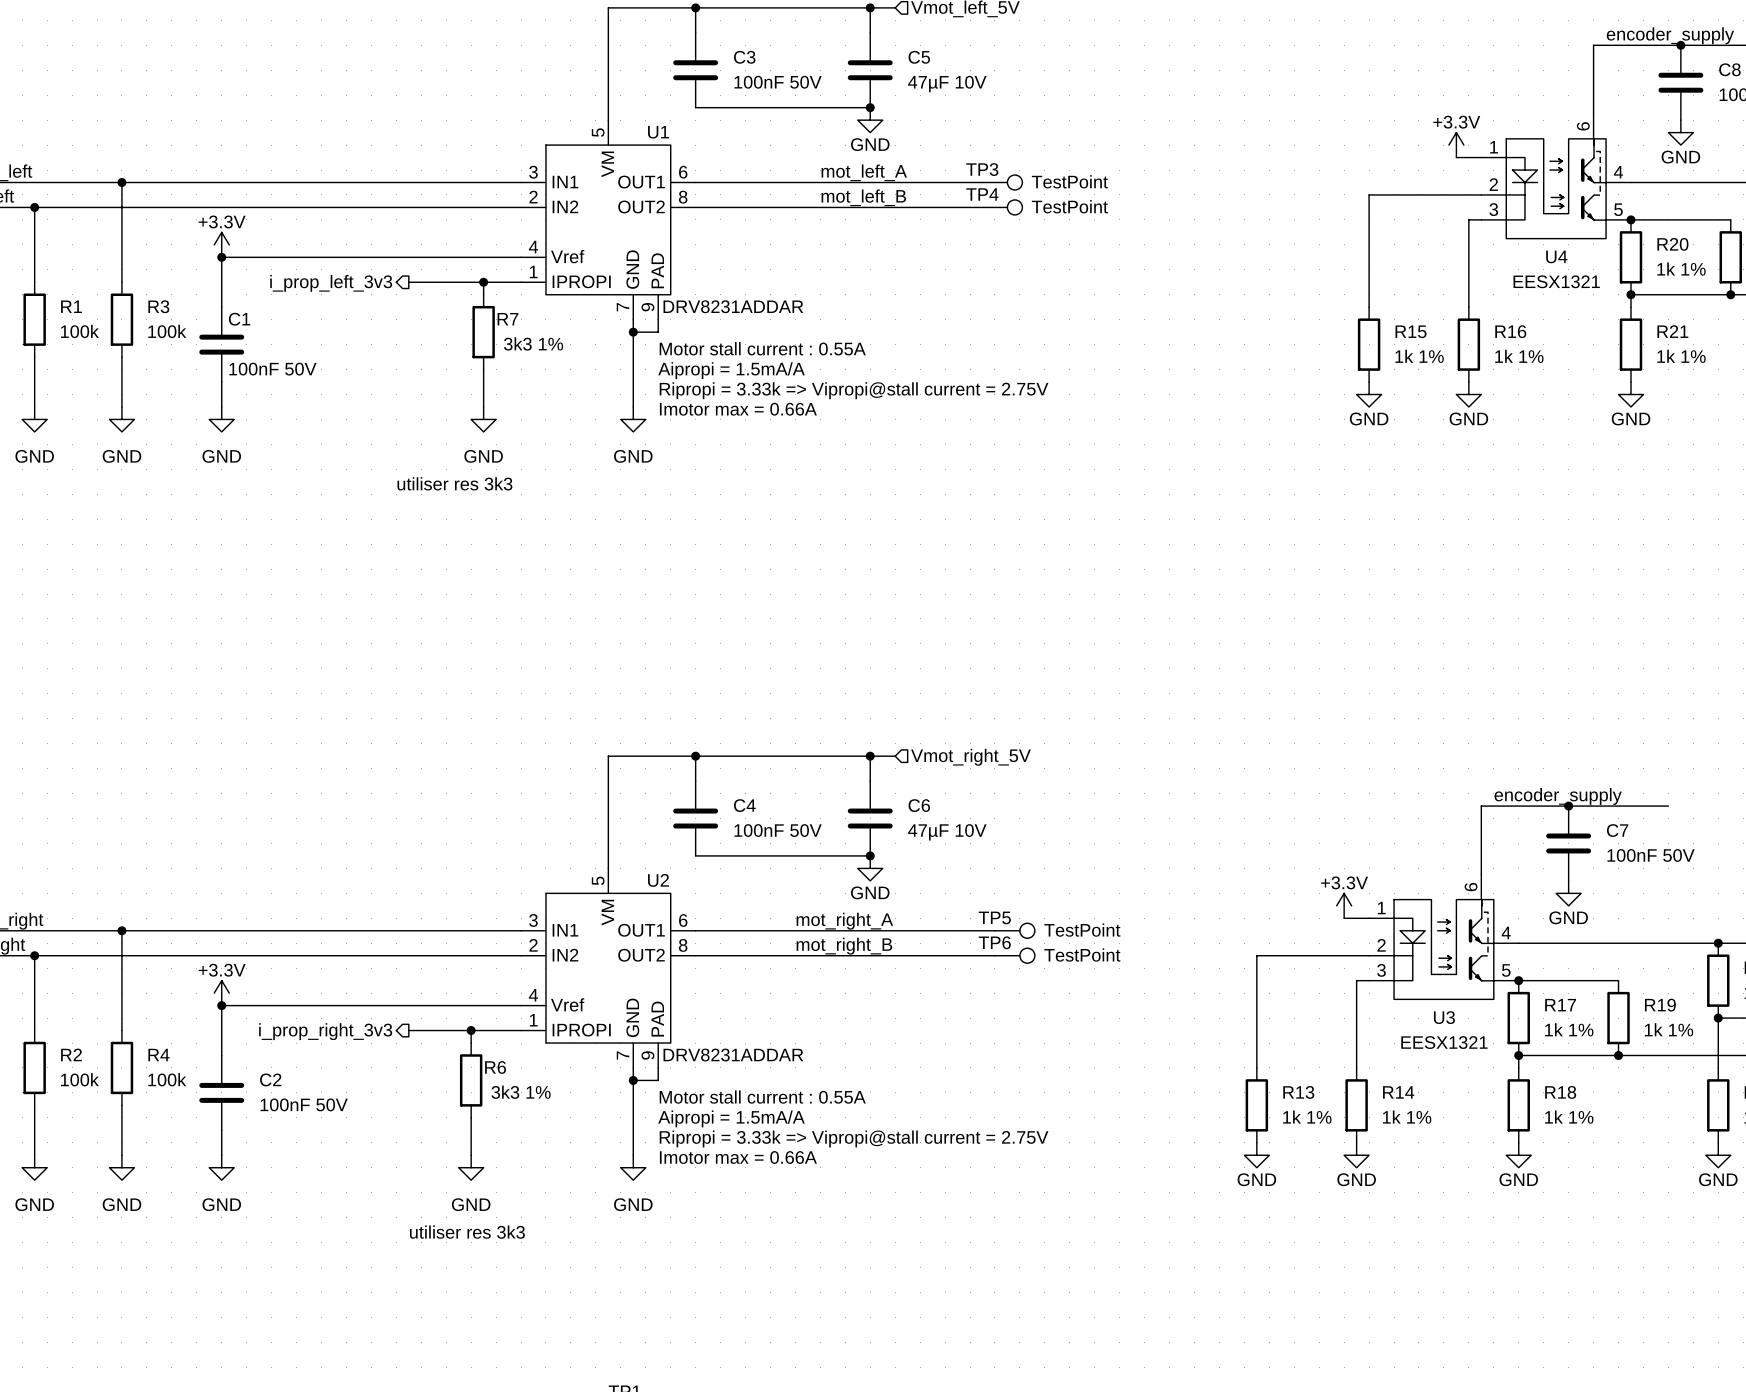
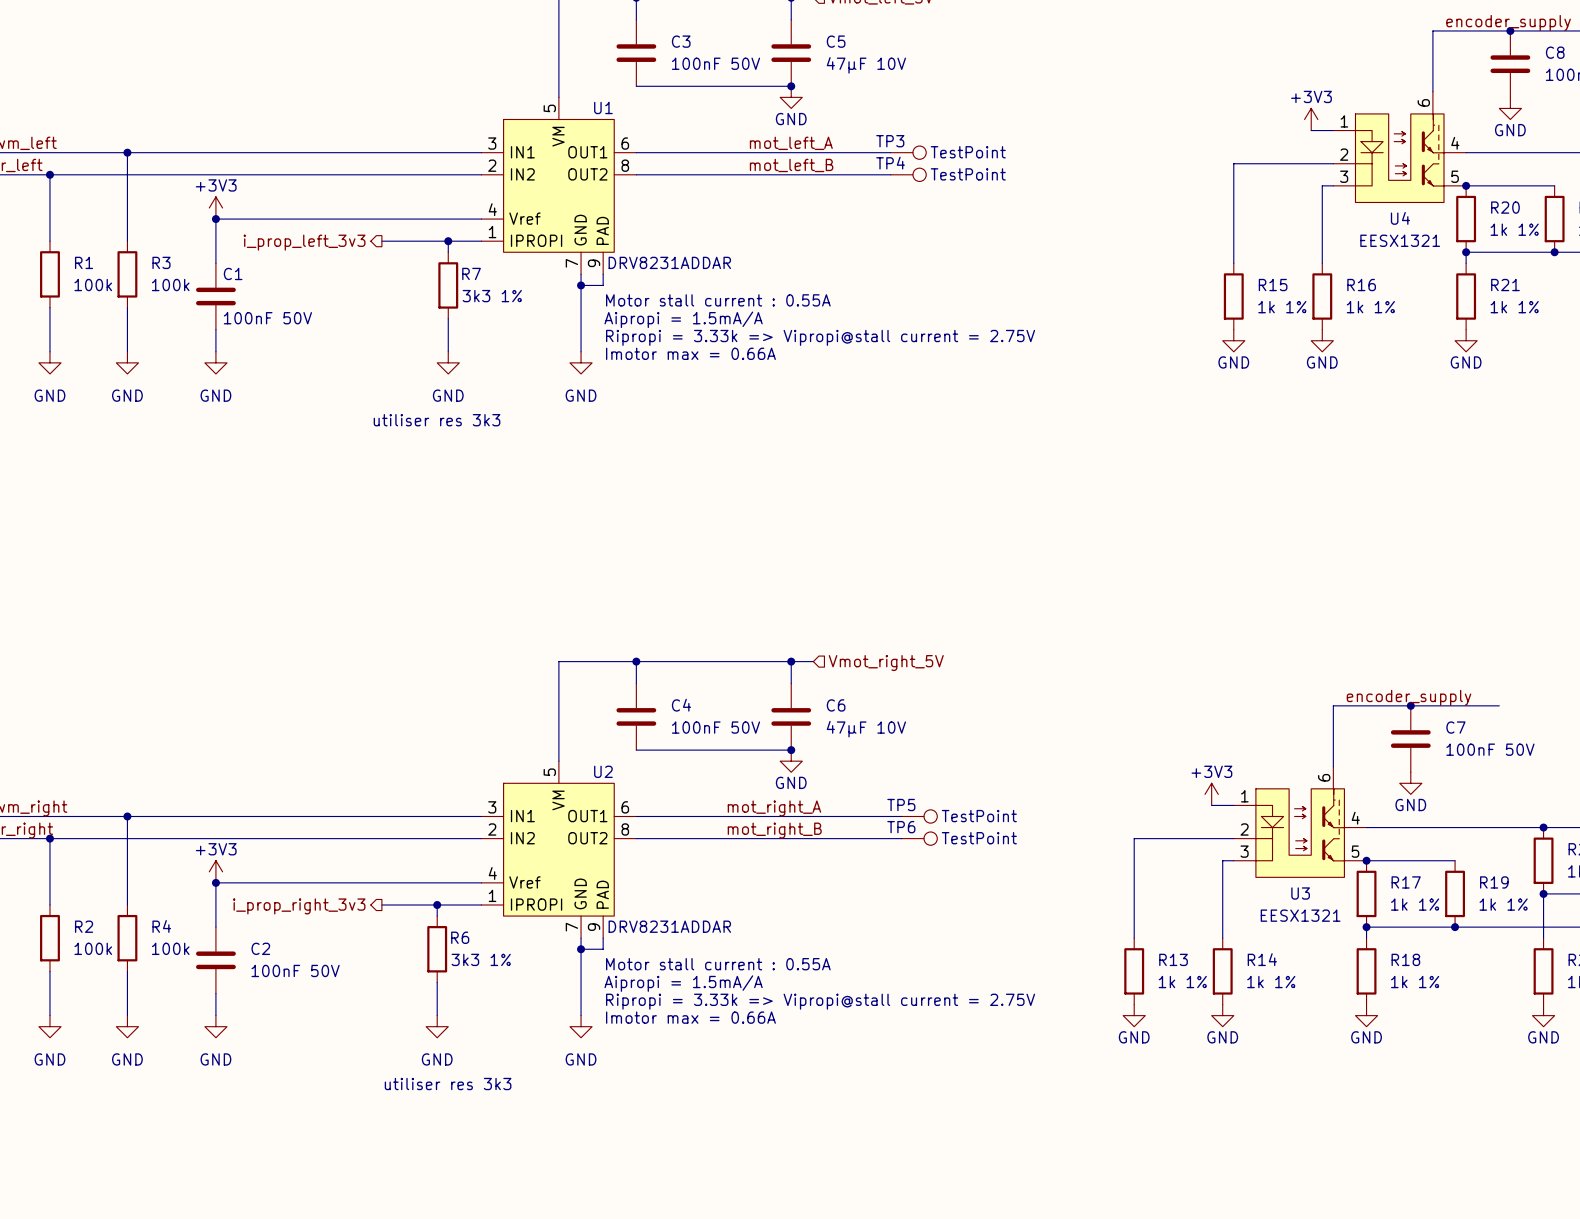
power symbol: +3.3V (1456, 145) -> +3V3 (1311, 119)
power symbol: +3.3V (221, 244) -> +3V3 (215, 207)
power symbol: +3.3V (1344, 905) -> +3V3 (1211, 794)
power symbol: +3.3V (221, 993) -> +3V3 (215, 871)

